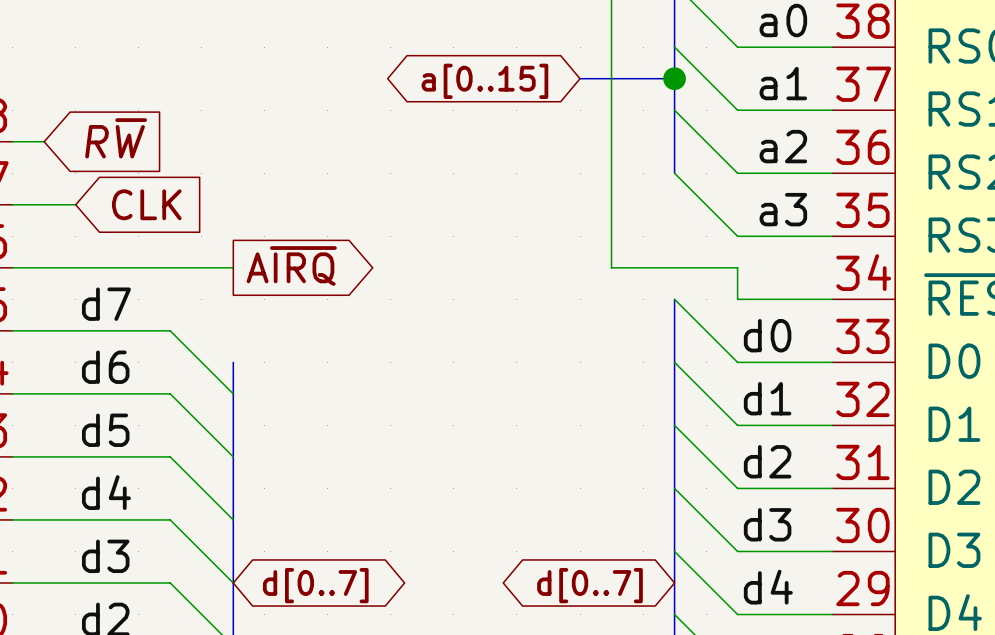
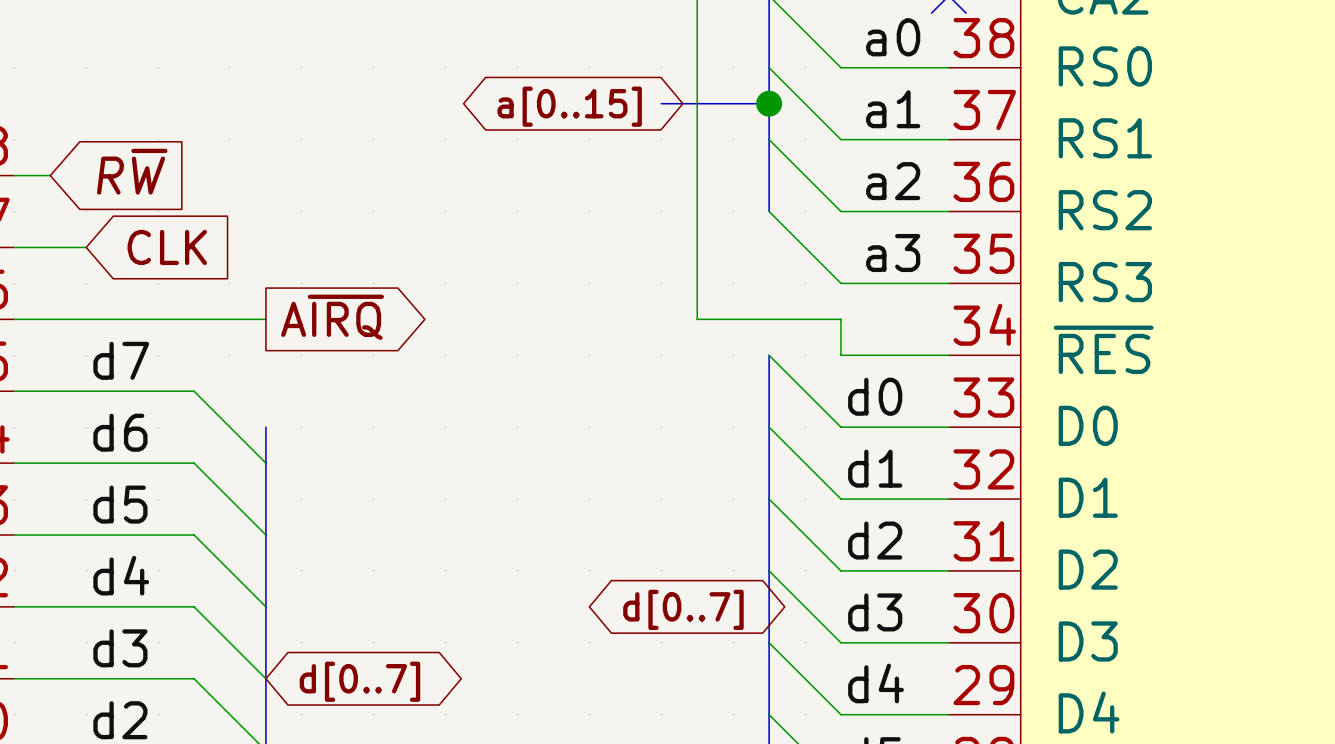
global label rotation: 0° (484, 81) -> 180° (569, 106)
global label rotation: 0° (590, 585) -> 180° (683, 609)

